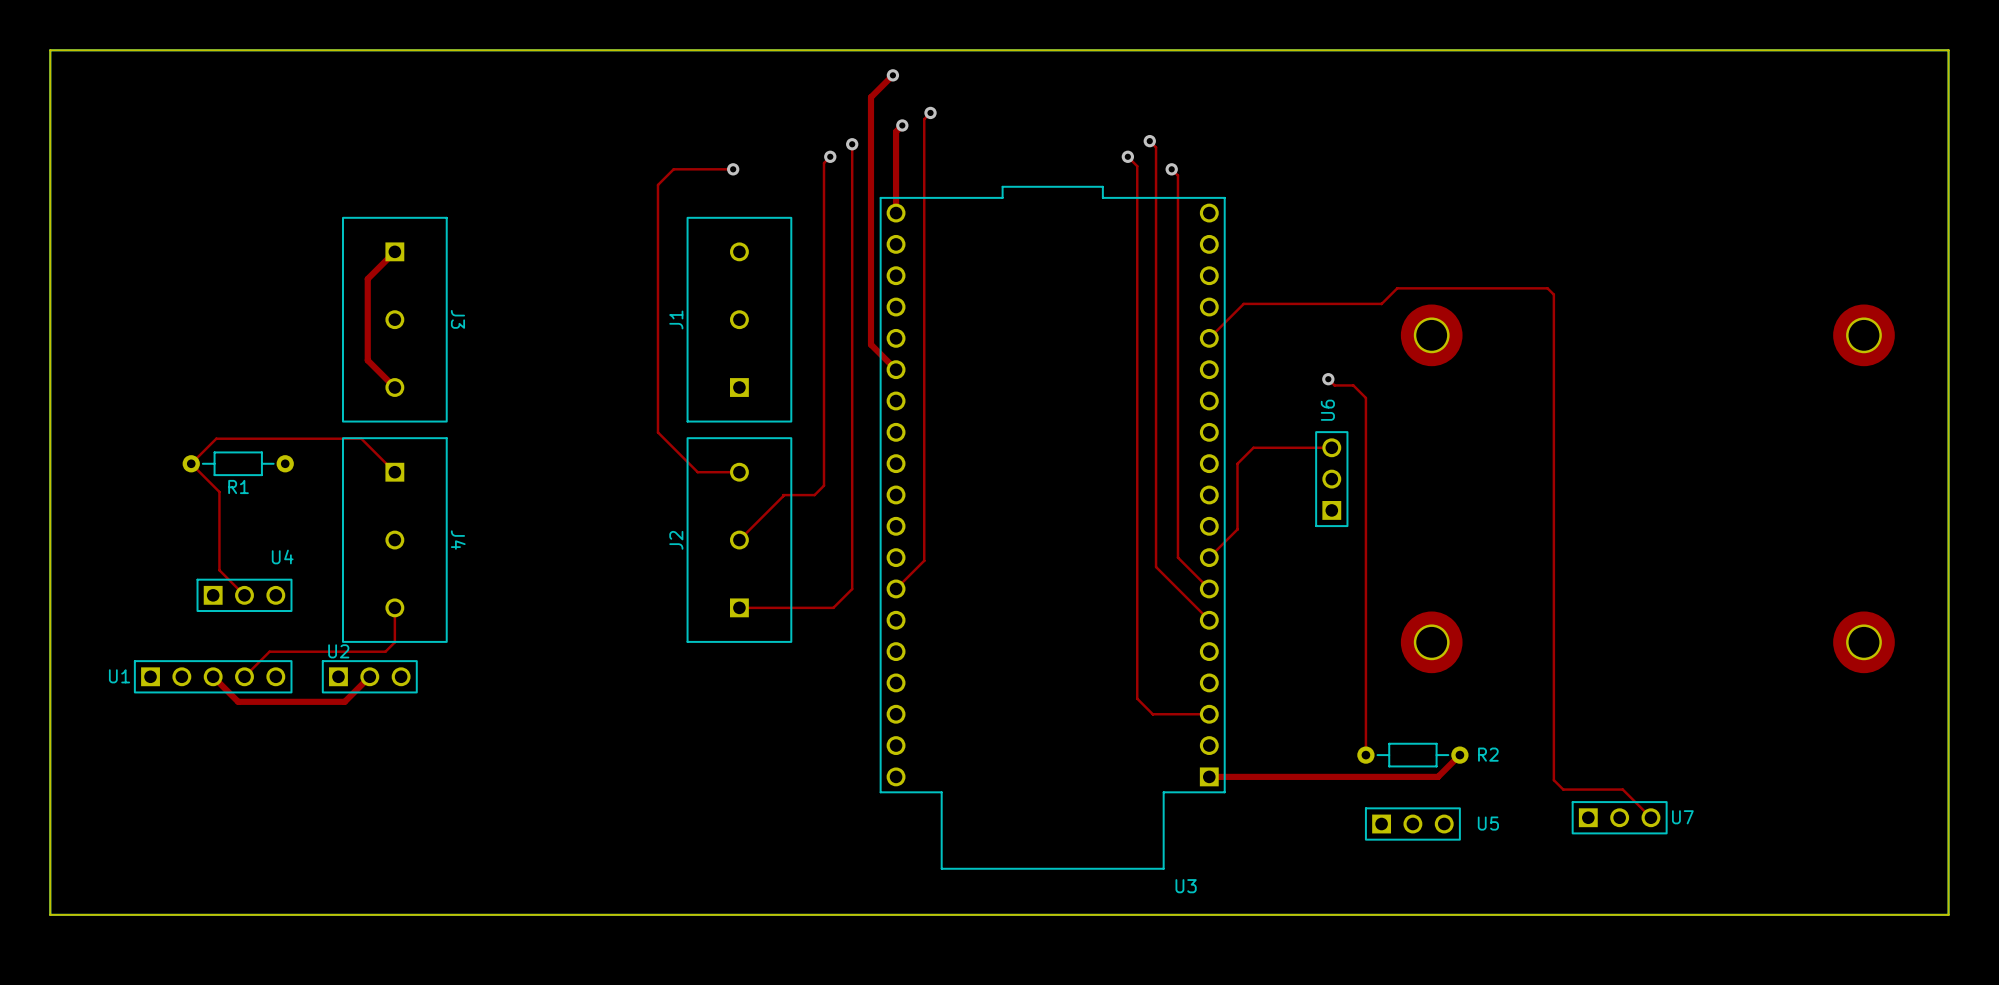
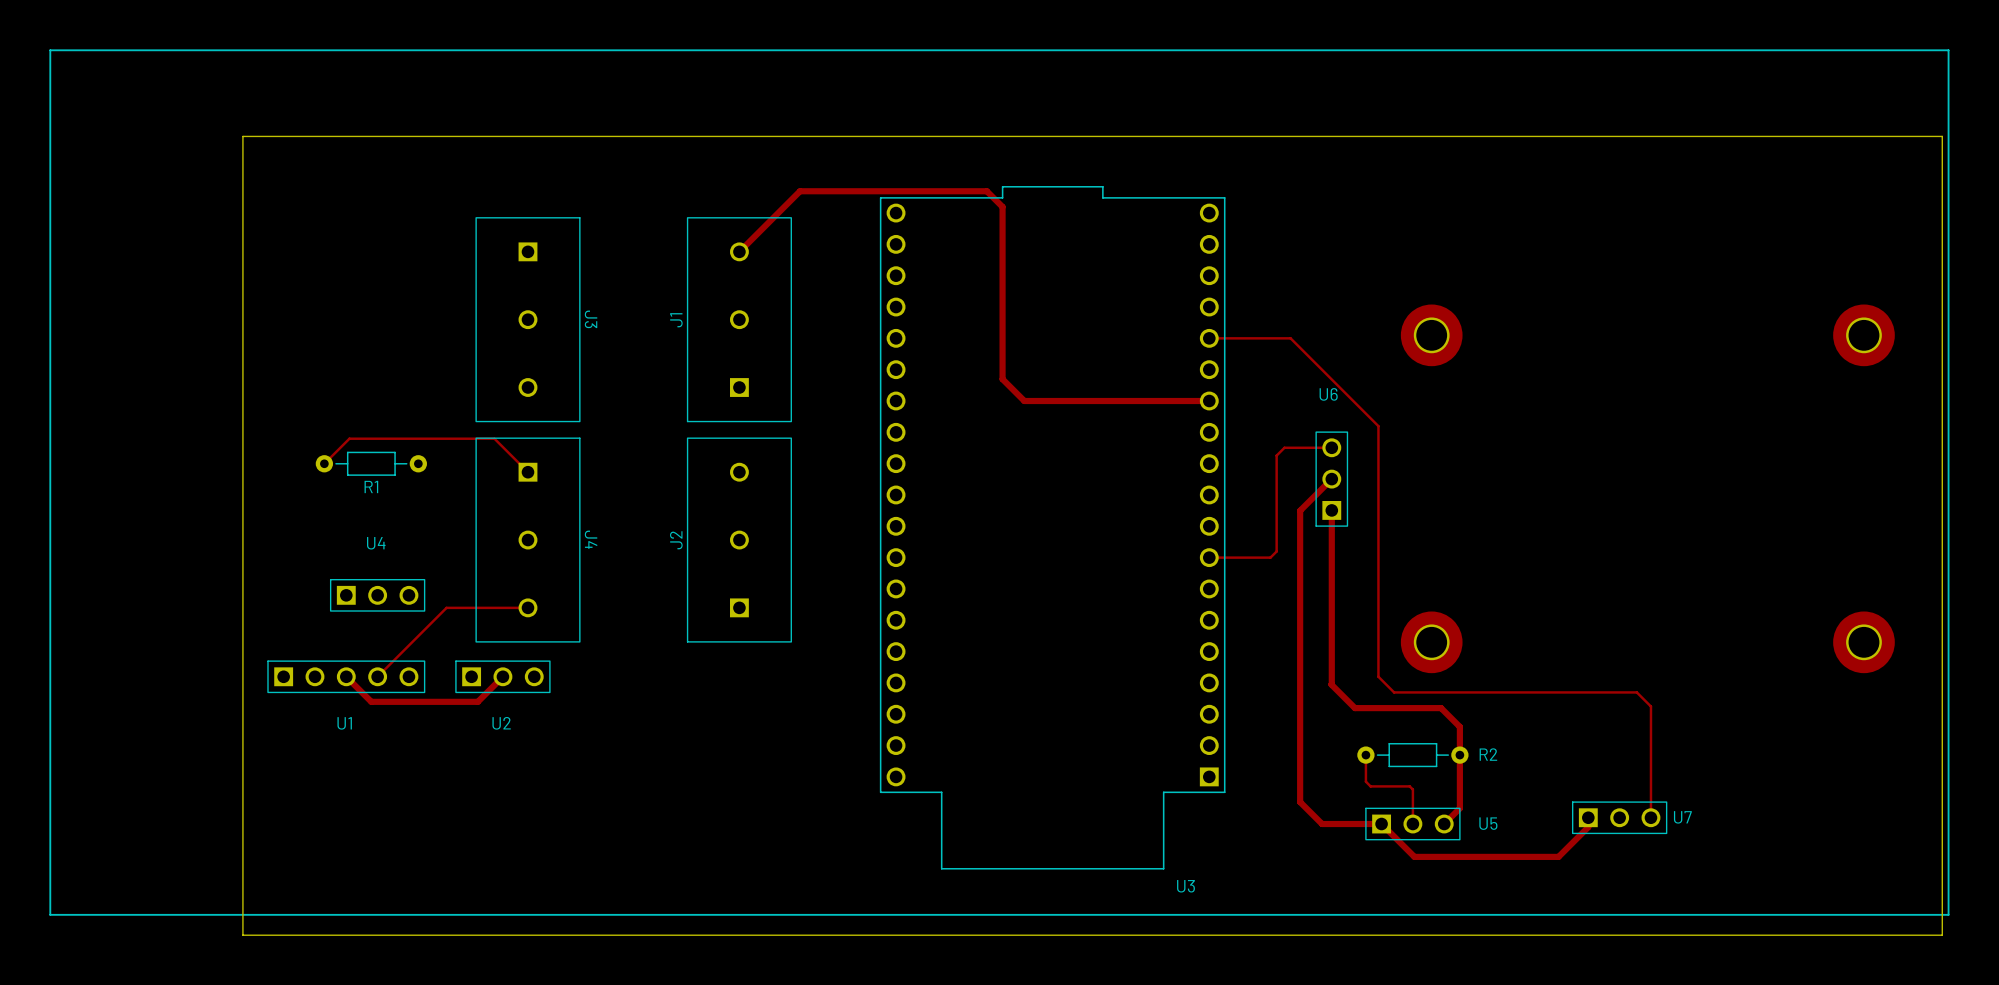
board edge: (50, 50) (1948, 50) (1948, 914) (50, 914) (50, 50) -> (242, 136) (242, 935) (1942, 935) (1942, 136) (242, 136)
track: (892, 75) (870, 97) (870, 344) (896, 369) -> none
via: (892, 75) -> none
track: (930, 112) (924, 119) (924, 560) -> none
via: (930, 112) -> none
track: (902, 125) (896, 131) (896, 213) -> none
via: (902, 125) -> none
track: (1149, 141) (1156, 147) (1156, 567) (1209, 620) -> none
via: (1149, 141) -> none
track: (852, 144) (852, 589) (833, 607) (739, 607) -> none
via: (852, 144) -> none
track: (830, 156) (824, 163) (824, 485) (814, 495) (783, 495) (739, 540) -> none
via: (830, 156) -> none
track: (1127, 156) (1137, 166) (1137, 698) (1152, 714) -> none
via: (1127, 156) -> none
track: (733, 169) (673, 169) (657, 184) (657, 432) (697, 472) (739, 472) -> none
via: (733, 169) -> none
track: (1171, 169) (1177, 175) (1177, 557) -> none
via: (1171, 169) -> none
track: (394, 251) (367, 278) (367, 360) (394, 387) -> none
track: none -> (739, 251) (800, 191) (986, 191) (1002, 206) (1002, 379) (1024, 401) (1209, 401)
track: (1381, 303) (1243, 303) (1209, 338) -> none
track: (1381, 304) (1397, 288) (1547, 288) (1553, 294) (1553, 780) (1563, 789) (1622, 789) (1650, 817) -> (1209, 338) (1290, 338) (1378, 426) (1378, 676) (1394, 692) (1636, 692) (1650, 706) (1650, 817)
J3 position: (394, 319) -> (527, 319)
track: (1328, 379) (1334, 385) (1353, 385) (1365, 397) (1365, 755) -> (1412, 824) (1412, 789) (1409, 786) (1370, 786) (1365, 781) (1365, 755)
via: (1328, 379) -> none
U6 name rotation: 0° (1327, 410) -> 90° clockwise (1328, 394)
track: (349, 438) (216, 438) (191, 463) (219, 491) (219, 570) (244, 595) -> (349, 438) (324, 463)
track: (361, 438) (394, 472) -> (361, 438) (494, 438) (527, 472)
track: (1284, 447) (1253, 447) (1237, 463) (1237, 529) -> (1284, 447) (1276, 455) (1276, 551) (1270, 557) (1209, 557)
R1 position: (238, 463) -> (371, 463)
track: none -> (1331, 479) (1300, 510) (1300, 802) (1322, 824) (1381, 824) (1414, 856) (1558, 856) (1588, 827) (1588, 817)
track: none -> (1331, 510) (1331, 684) (1354, 708) (1441, 708) (1459, 726) (1459, 808) (1444, 824)
track: (1237, 529) (1209, 557) -> none
J4 position: (394, 540) -> (527, 540)
U4 name position: U4 (282, 556) -> U4 (376, 543)
track: (1178, 557) (1209, 588) -> none
track: (924, 560) (896, 588) -> none
U4 position: (244, 595) -> (377, 595)
track: (394, 607) (394, 642) (385, 651) (269, 651) (244, 676) -> none
track: none -> (527, 607) (446, 607) (377, 676)
U2 name position: U2 (338, 651) -> U2 (501, 723)
U1 name position: U1 (119, 676) -> U1 (344, 723)
track: (213, 676) (238, 701) (344, 701) (369, 676) -> (346, 676) (371, 701) (477, 701) (502, 676)
U1 position: (213, 676) -> (346, 676)
U2 position: (369, 676) -> (502, 676)
track: (1153, 714) (1209, 714) -> none
track: (1459, 755) (1438, 776) (1209, 776) -> none

